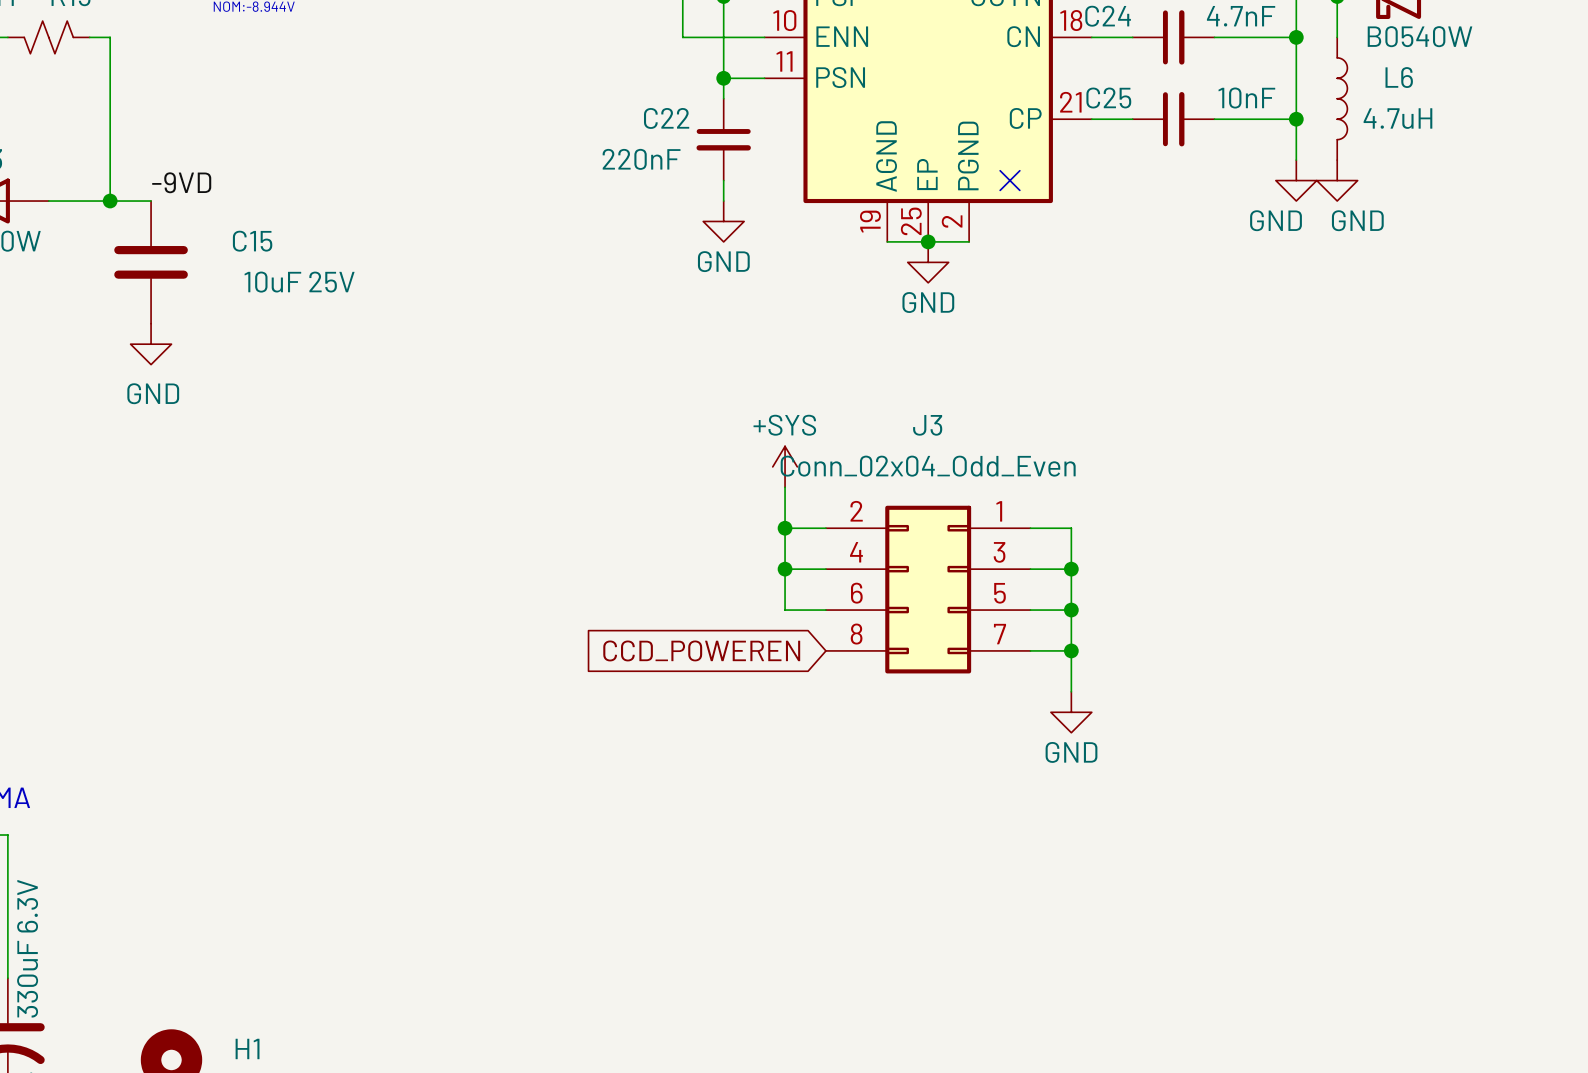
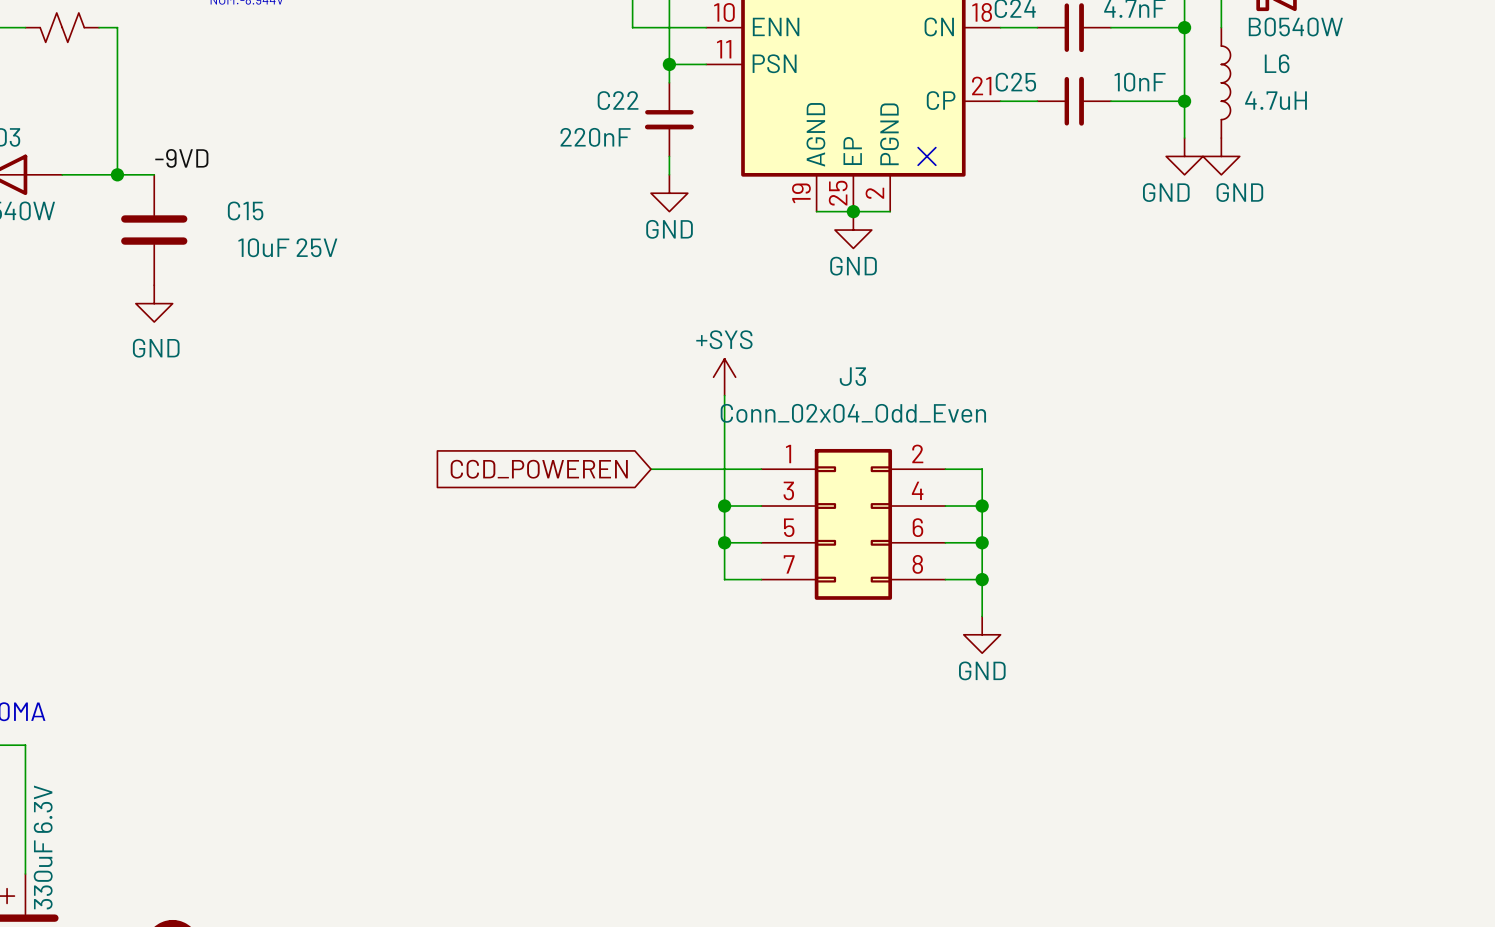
power symbol position: +SYS (785, 466) -> +SYS (724, 377)
wire: none -> (651, 469) (724, 469)
junction position: (785, 528) -> (724, 542)
J3 flip: as is (928, 589) -> left-right (853, 524)
wire: none -> (724, 542) (724, 579) (761, 579)
global label position: CCD_POWEREN (701, 650) -> CCD_POWEREN (539, 469)

